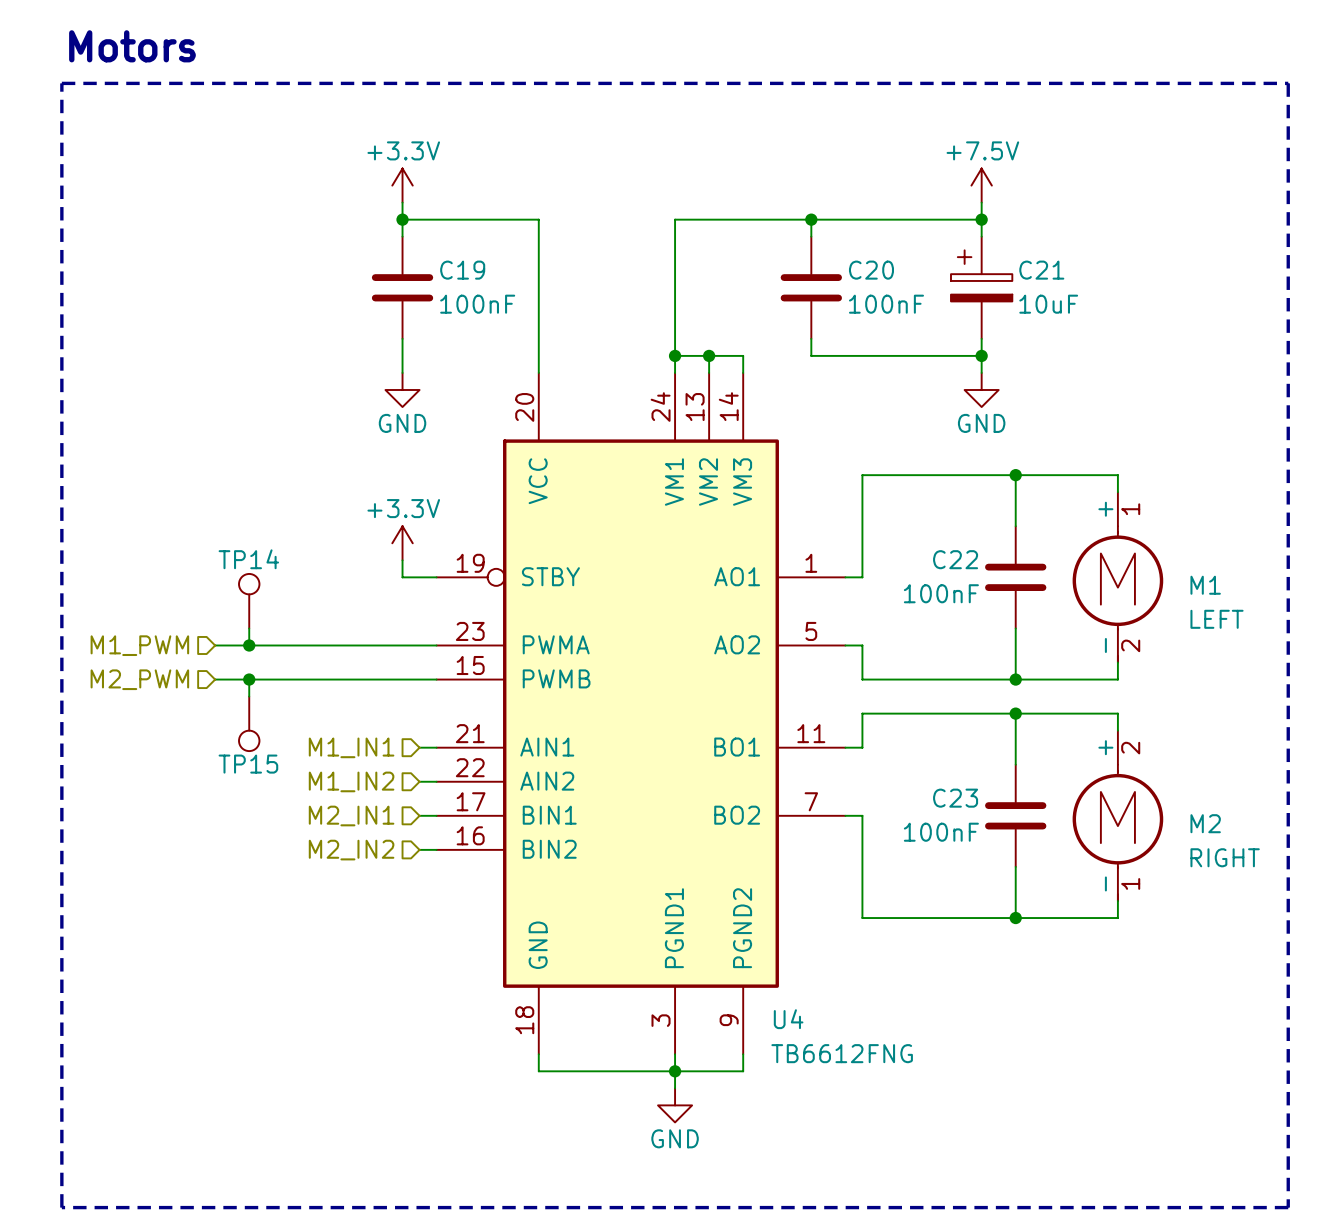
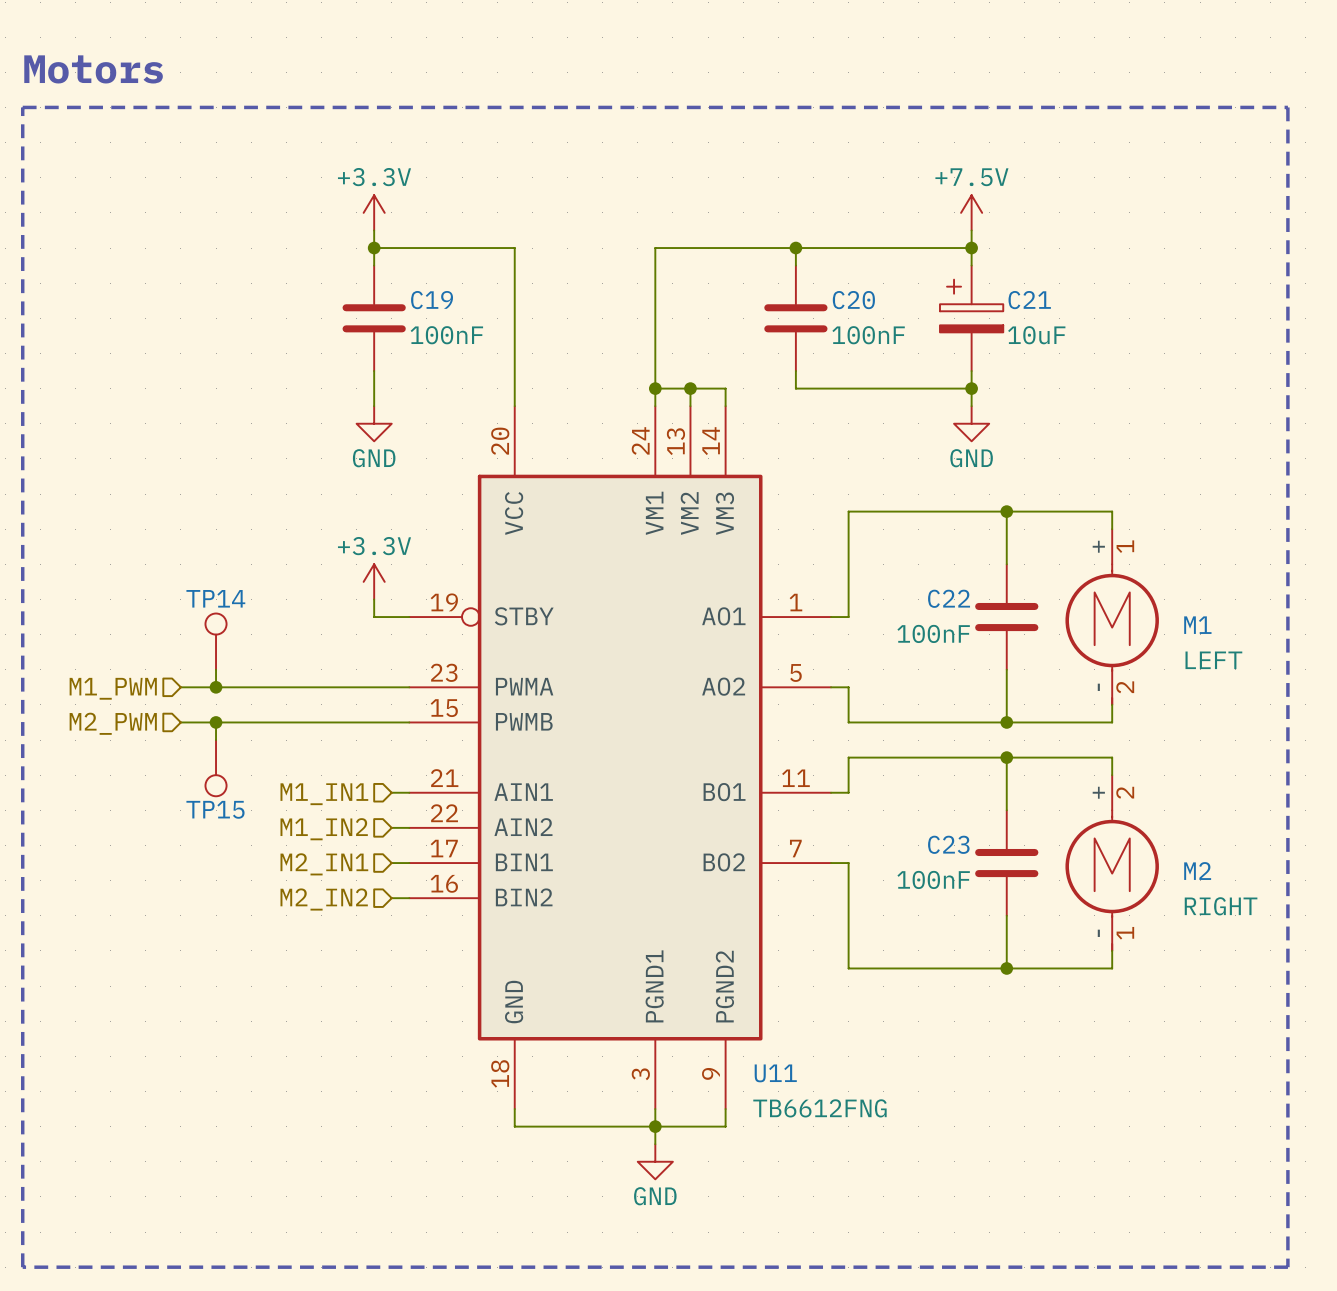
U4 name: U4 (788, 1019) -> U11 (775, 1073)

